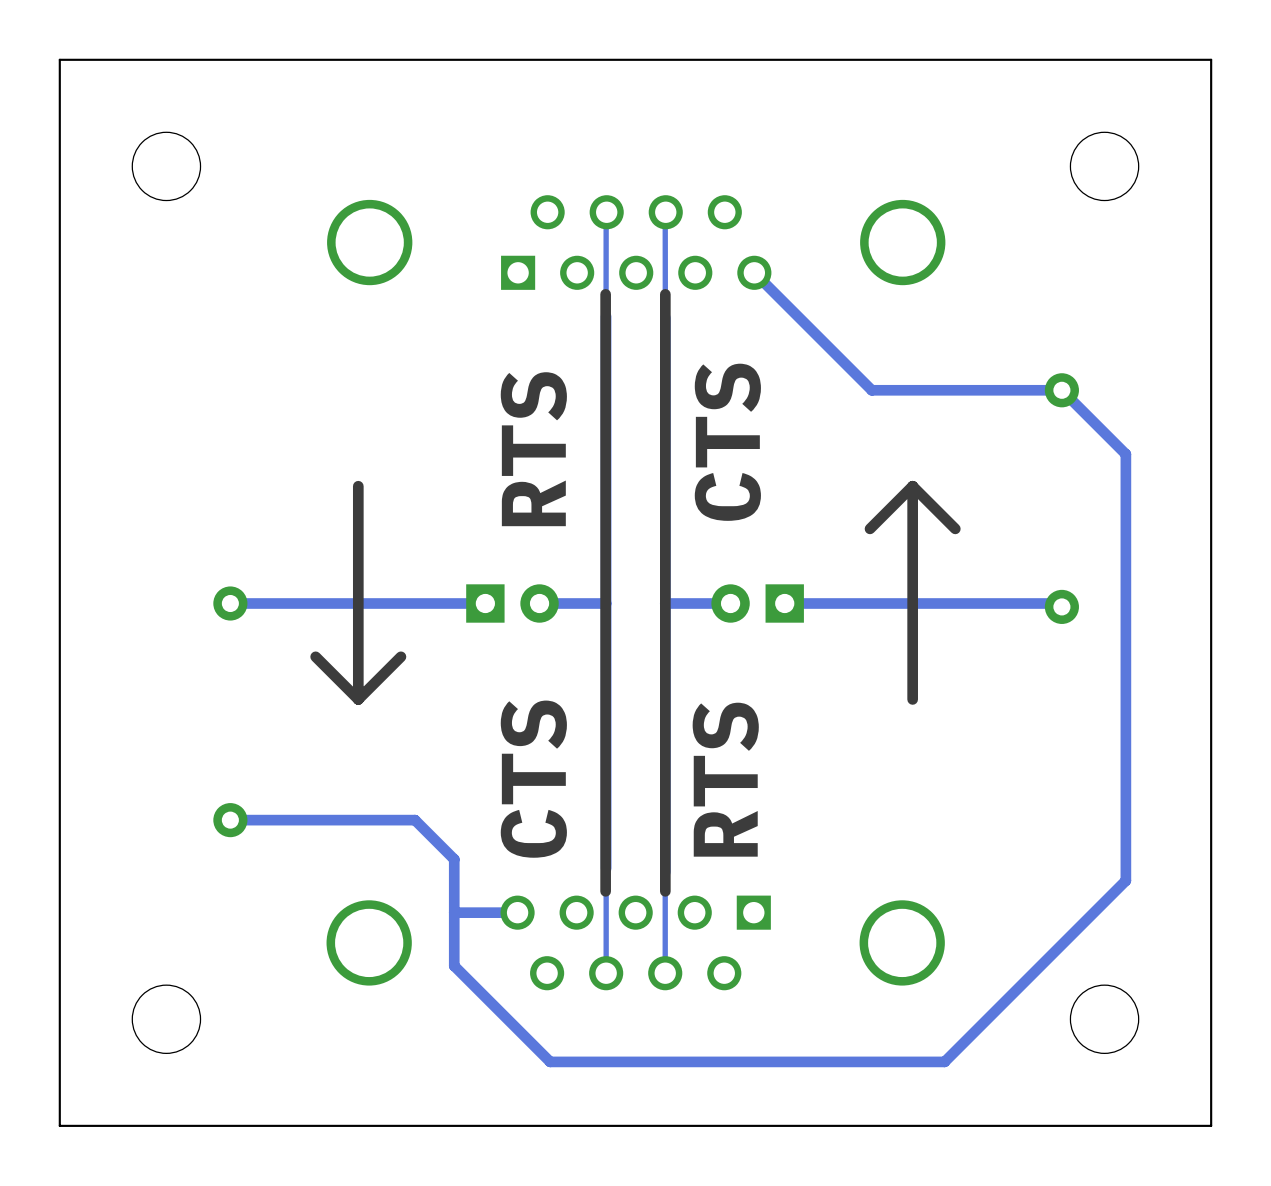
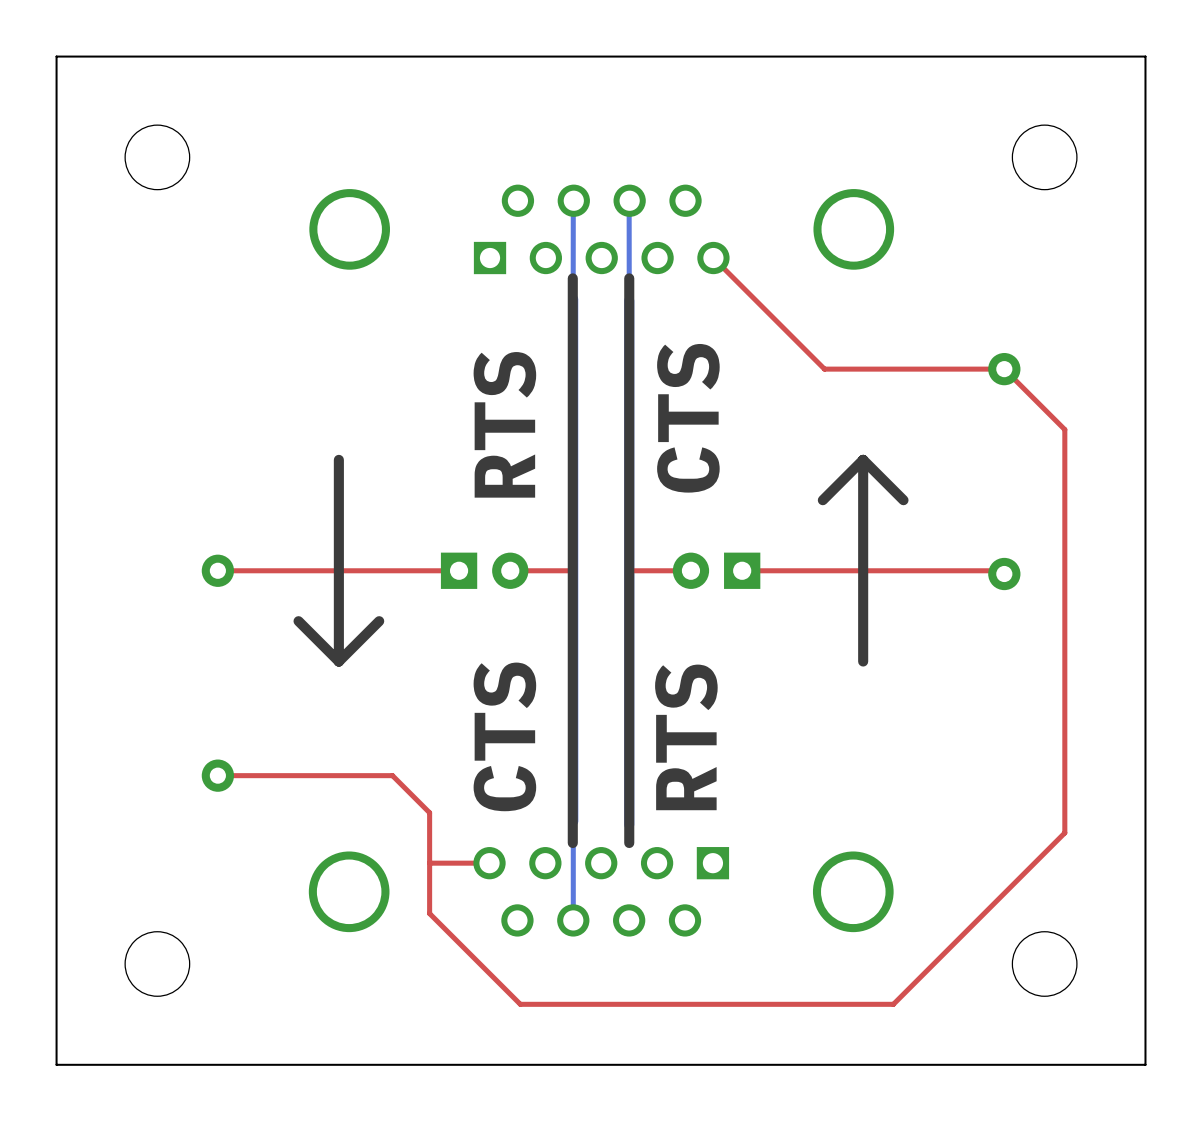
bottom track: (754, 272) (871, 390) (1061, 390) (1125, 454) (1125, 880) (944, 1061) (550, 1061) (454, 965) (454, 859) (415, 820) (230, 820) -> none
top track: none -> (713, 258) (824, 369) (1004, 369) (1064, 429) (1064, 832) (893, 1004) (520, 1004) (429, 913) (429, 812) (392, 775) (217, 775)
bottom track: (230, 603) (485, 603) -> none
top track: none -> (217, 570) (459, 570)
bottom track: (539, 603) (606, 603) -> none
top track: none -> (510, 570) (573, 570)
bottom track: (665, 603) (730, 603) -> none
top track: none -> (629, 570) (690, 570)
bottom track: (784, 603) (1058, 603) -> none
top track: none -> (742, 570) (1001, 570)
bottom track: (665, 872) (665, 973) -> none
bottom track: (454, 912) (517, 912) -> none
top track: none -> (429, 863) (489, 863)

